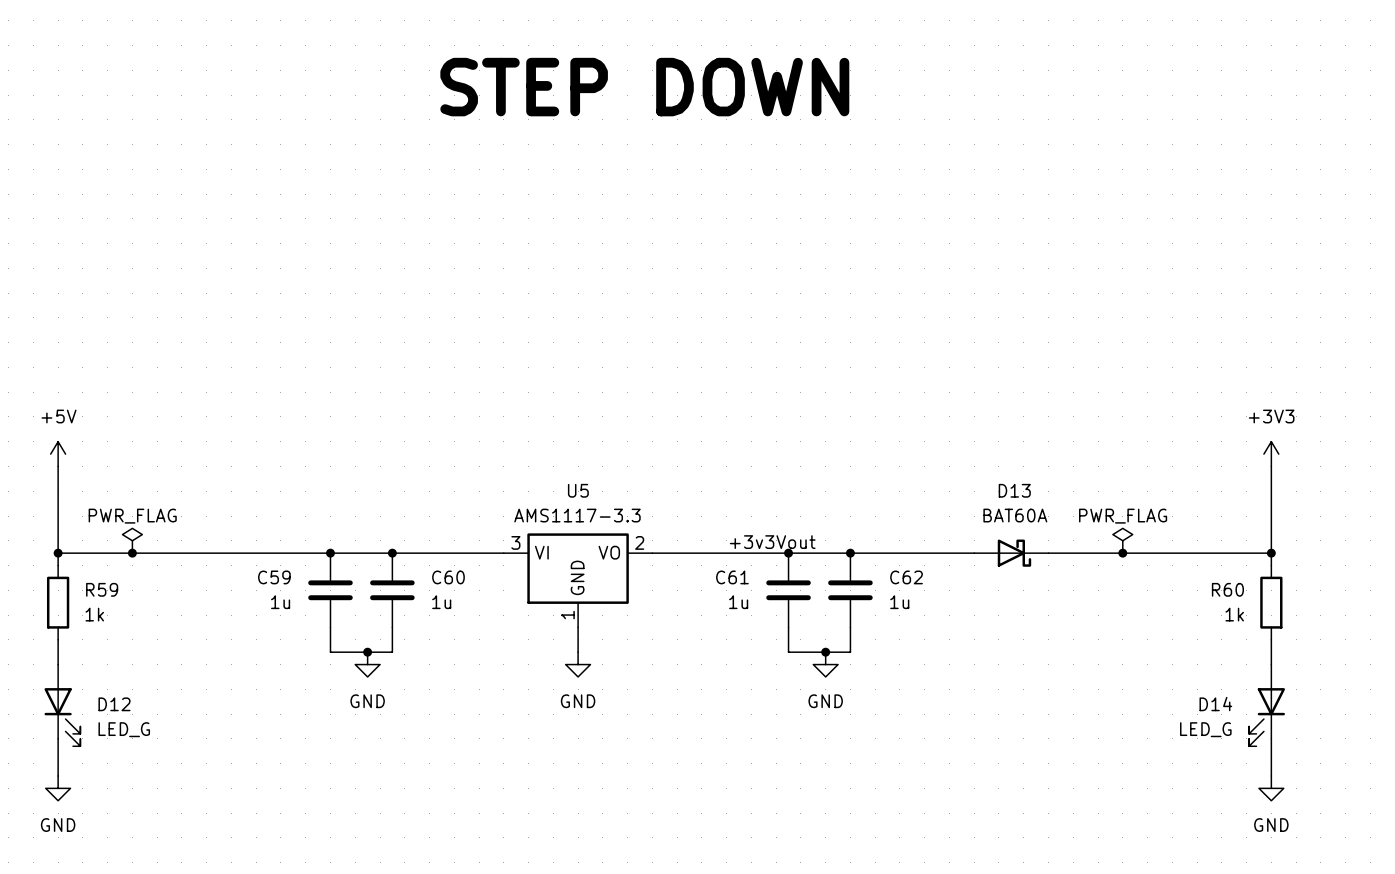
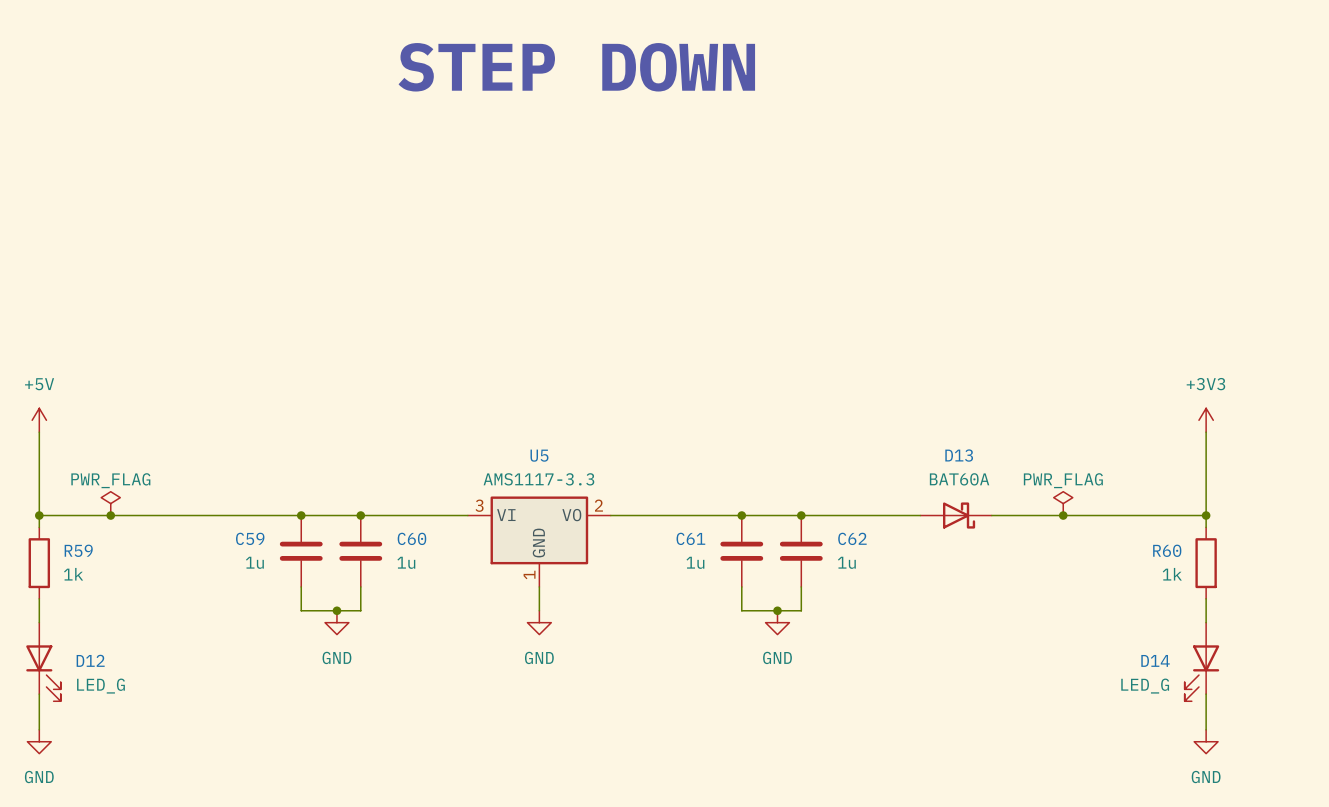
label: +3v3Vout (772, 542) -> none

